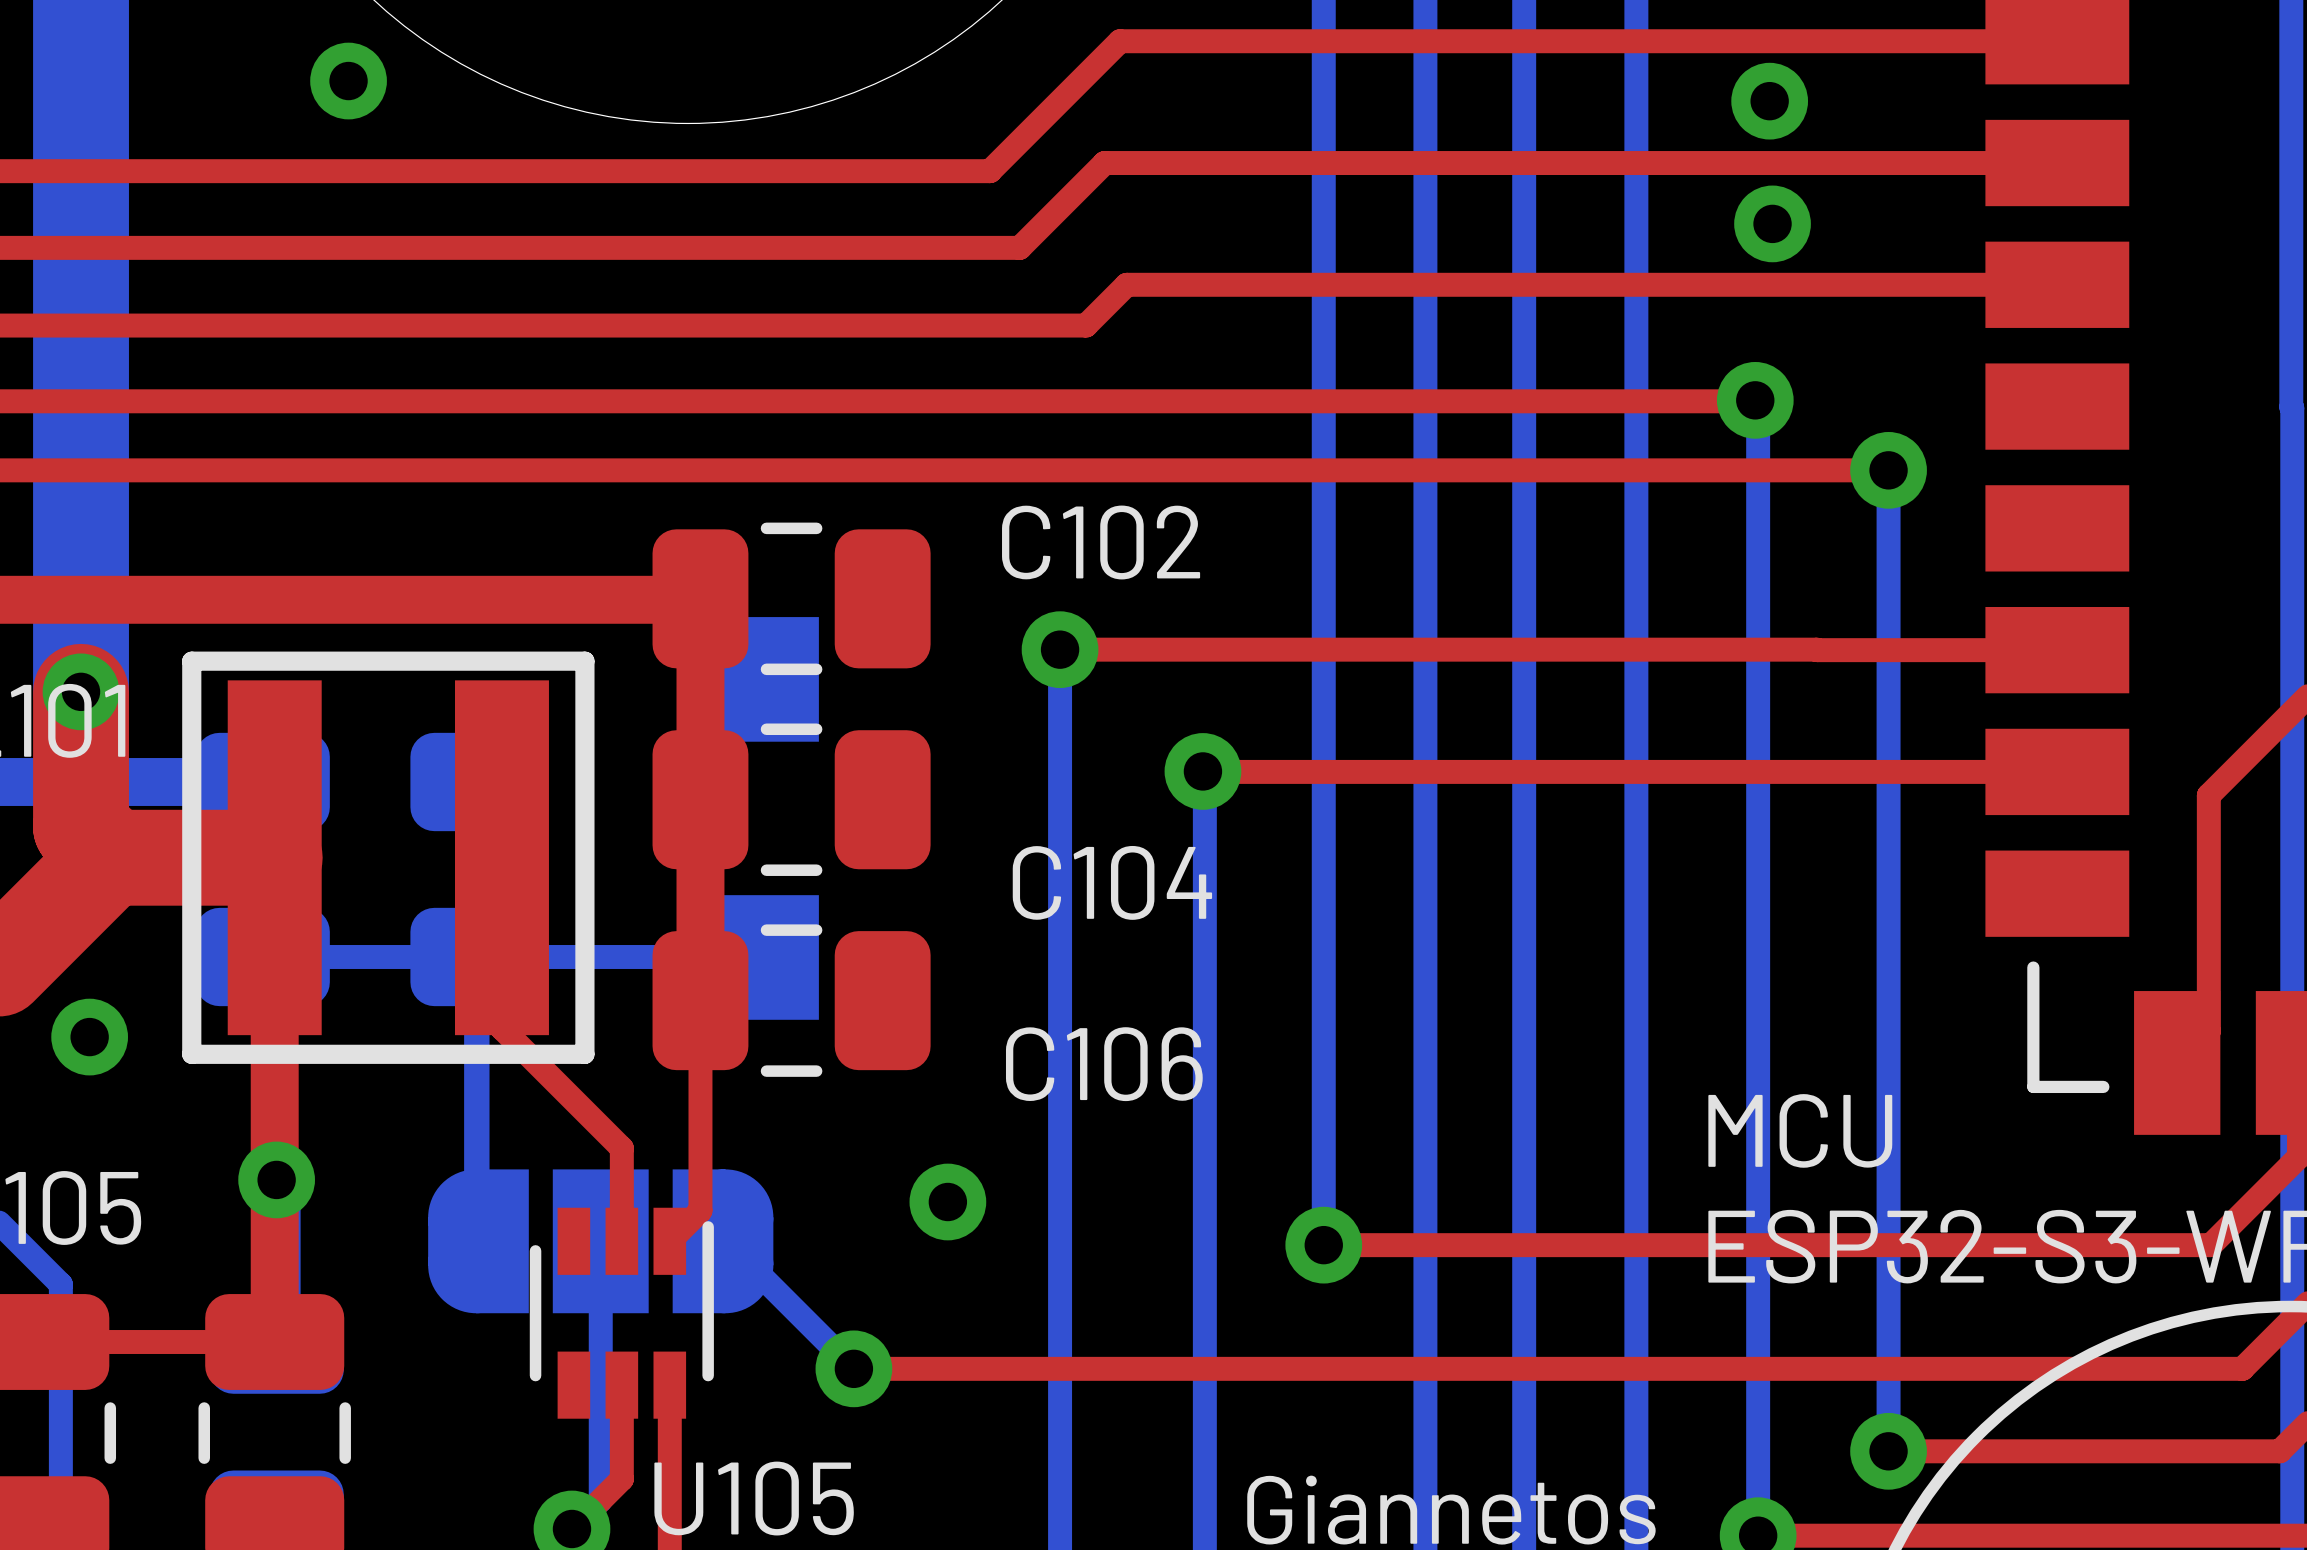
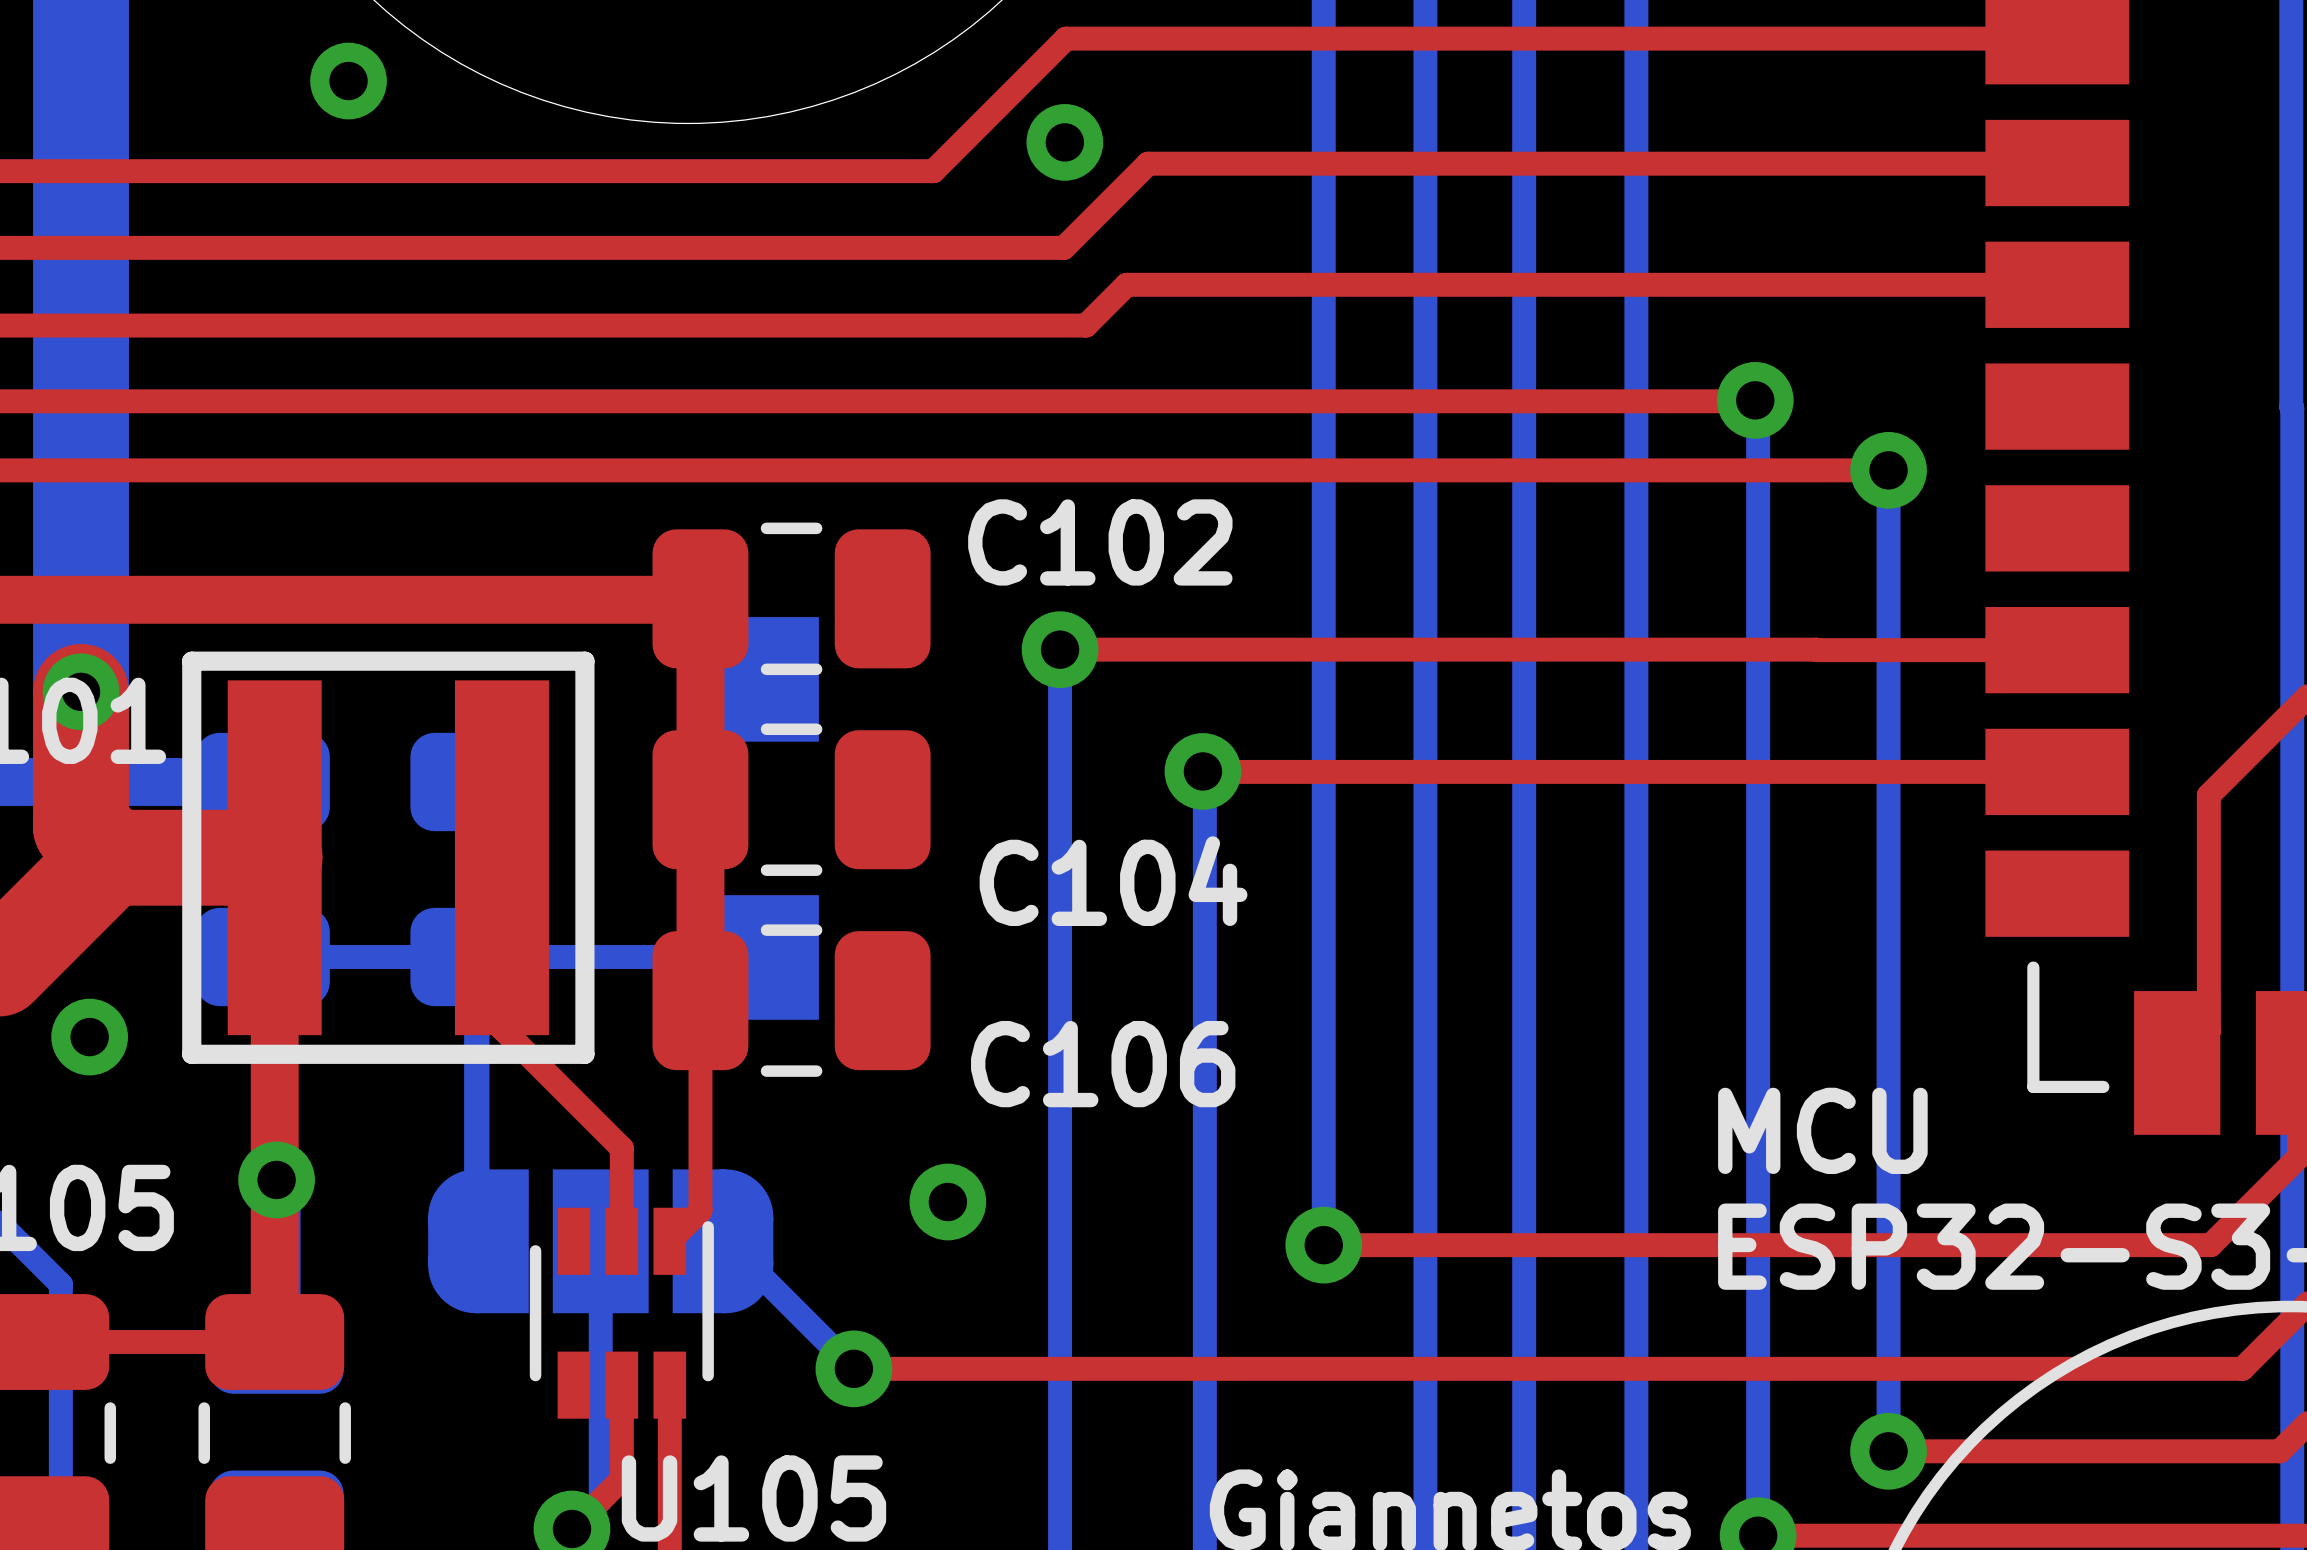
top track: (2057, 41) (1120, 41) (990, 171) (933, 171) -> (2057, 41) (2054, 38) (1066, 38) (933, 171)
via: (1769, 101) -> none
via: none -> (1064, 142)
top track: (2057, 163) (1104, 163) (1019, 247) -> (2056, 163) (1148, 163) (1063, 247) (1019, 247)
via: (1772, 223) -> none

